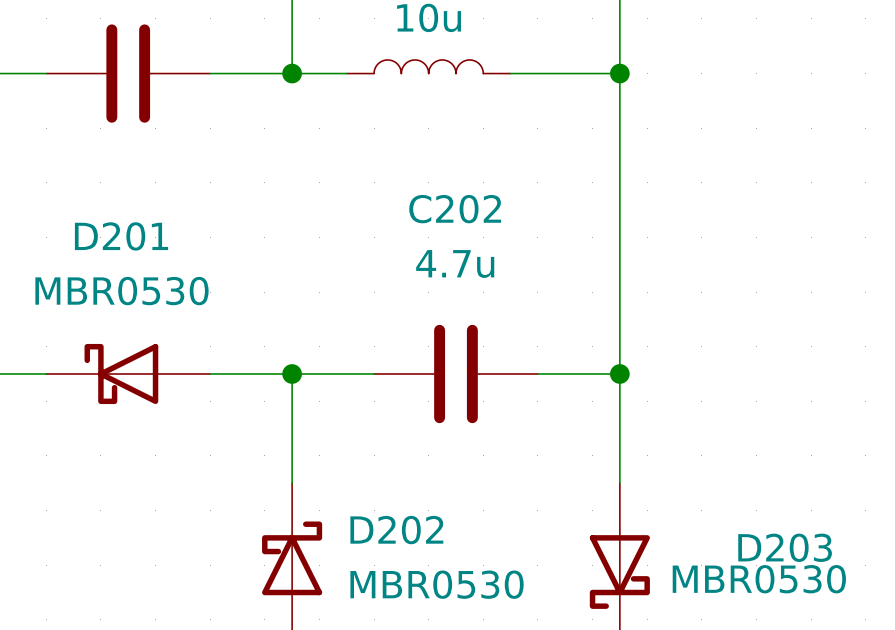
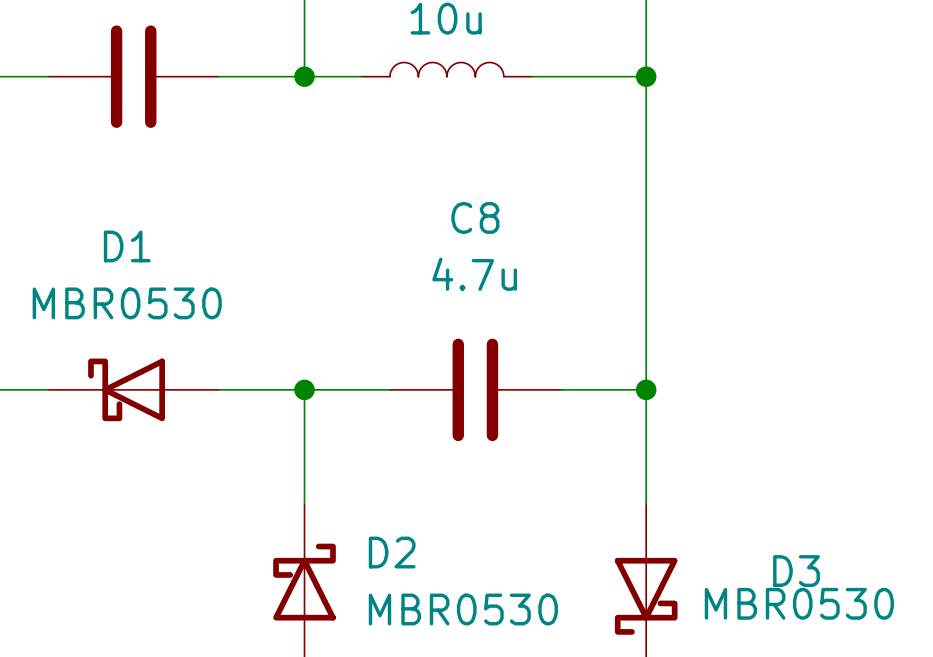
C202 name: C202 (455, 209) -> C8 (475, 217)
D201 name: D201 (121, 236) -> D1 (127, 246)
D202 name: D202 (396, 530) -> D2 (392, 552)
D203 name: D203 (785, 547) -> D3 (796, 571)

